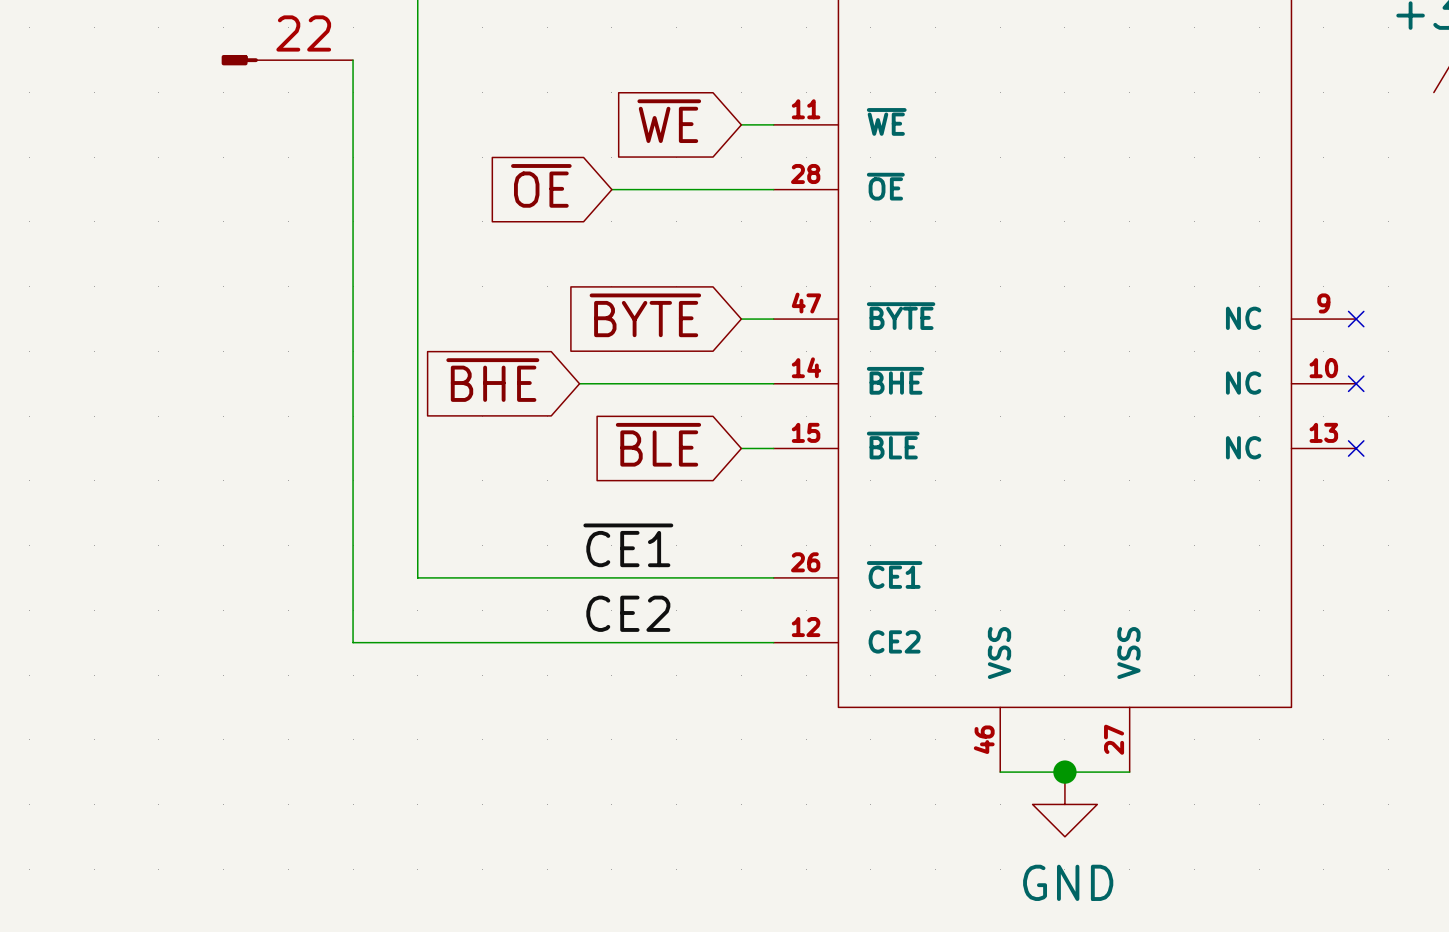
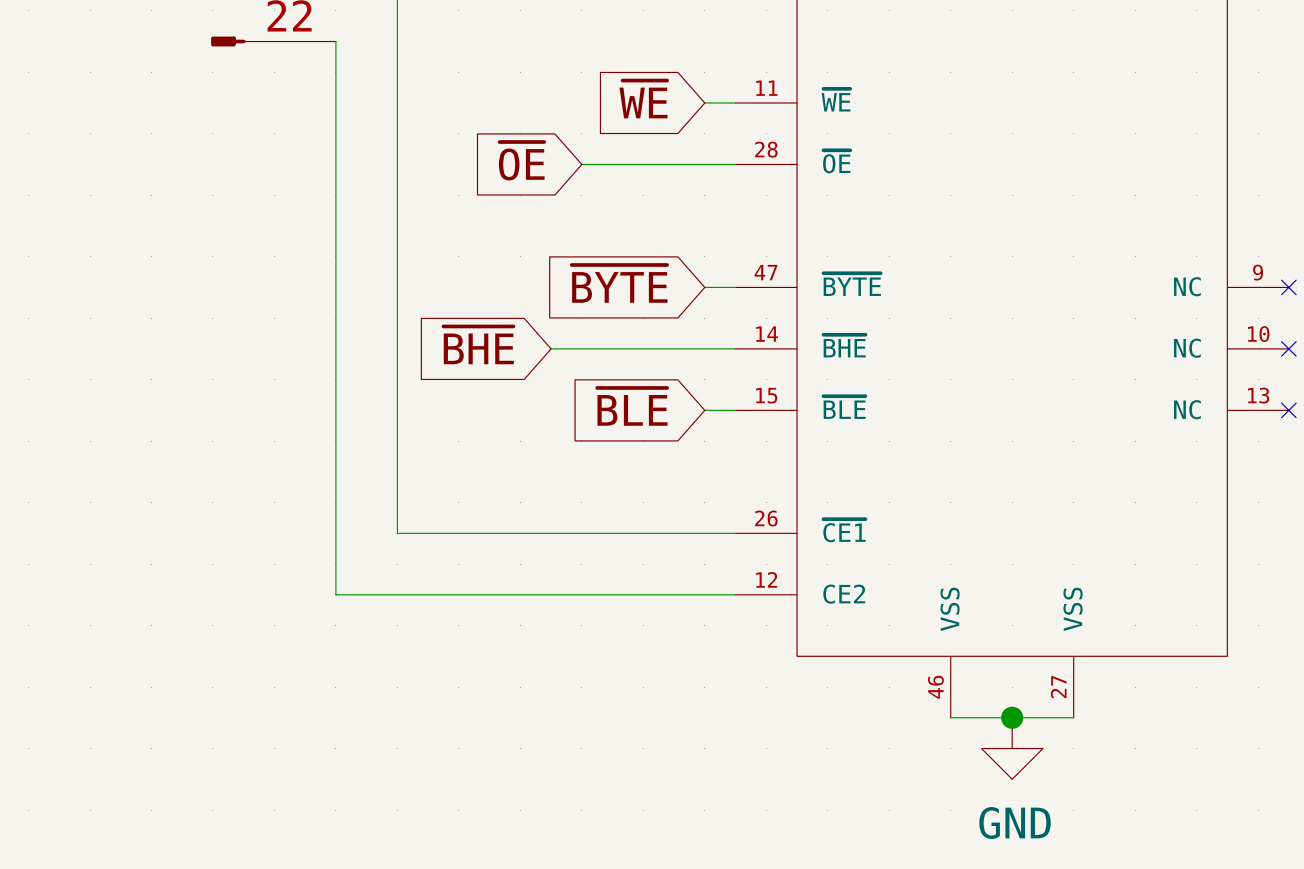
label: ~{CE1} (628, 545) -> none
label: CE2 (628, 613) -> none

